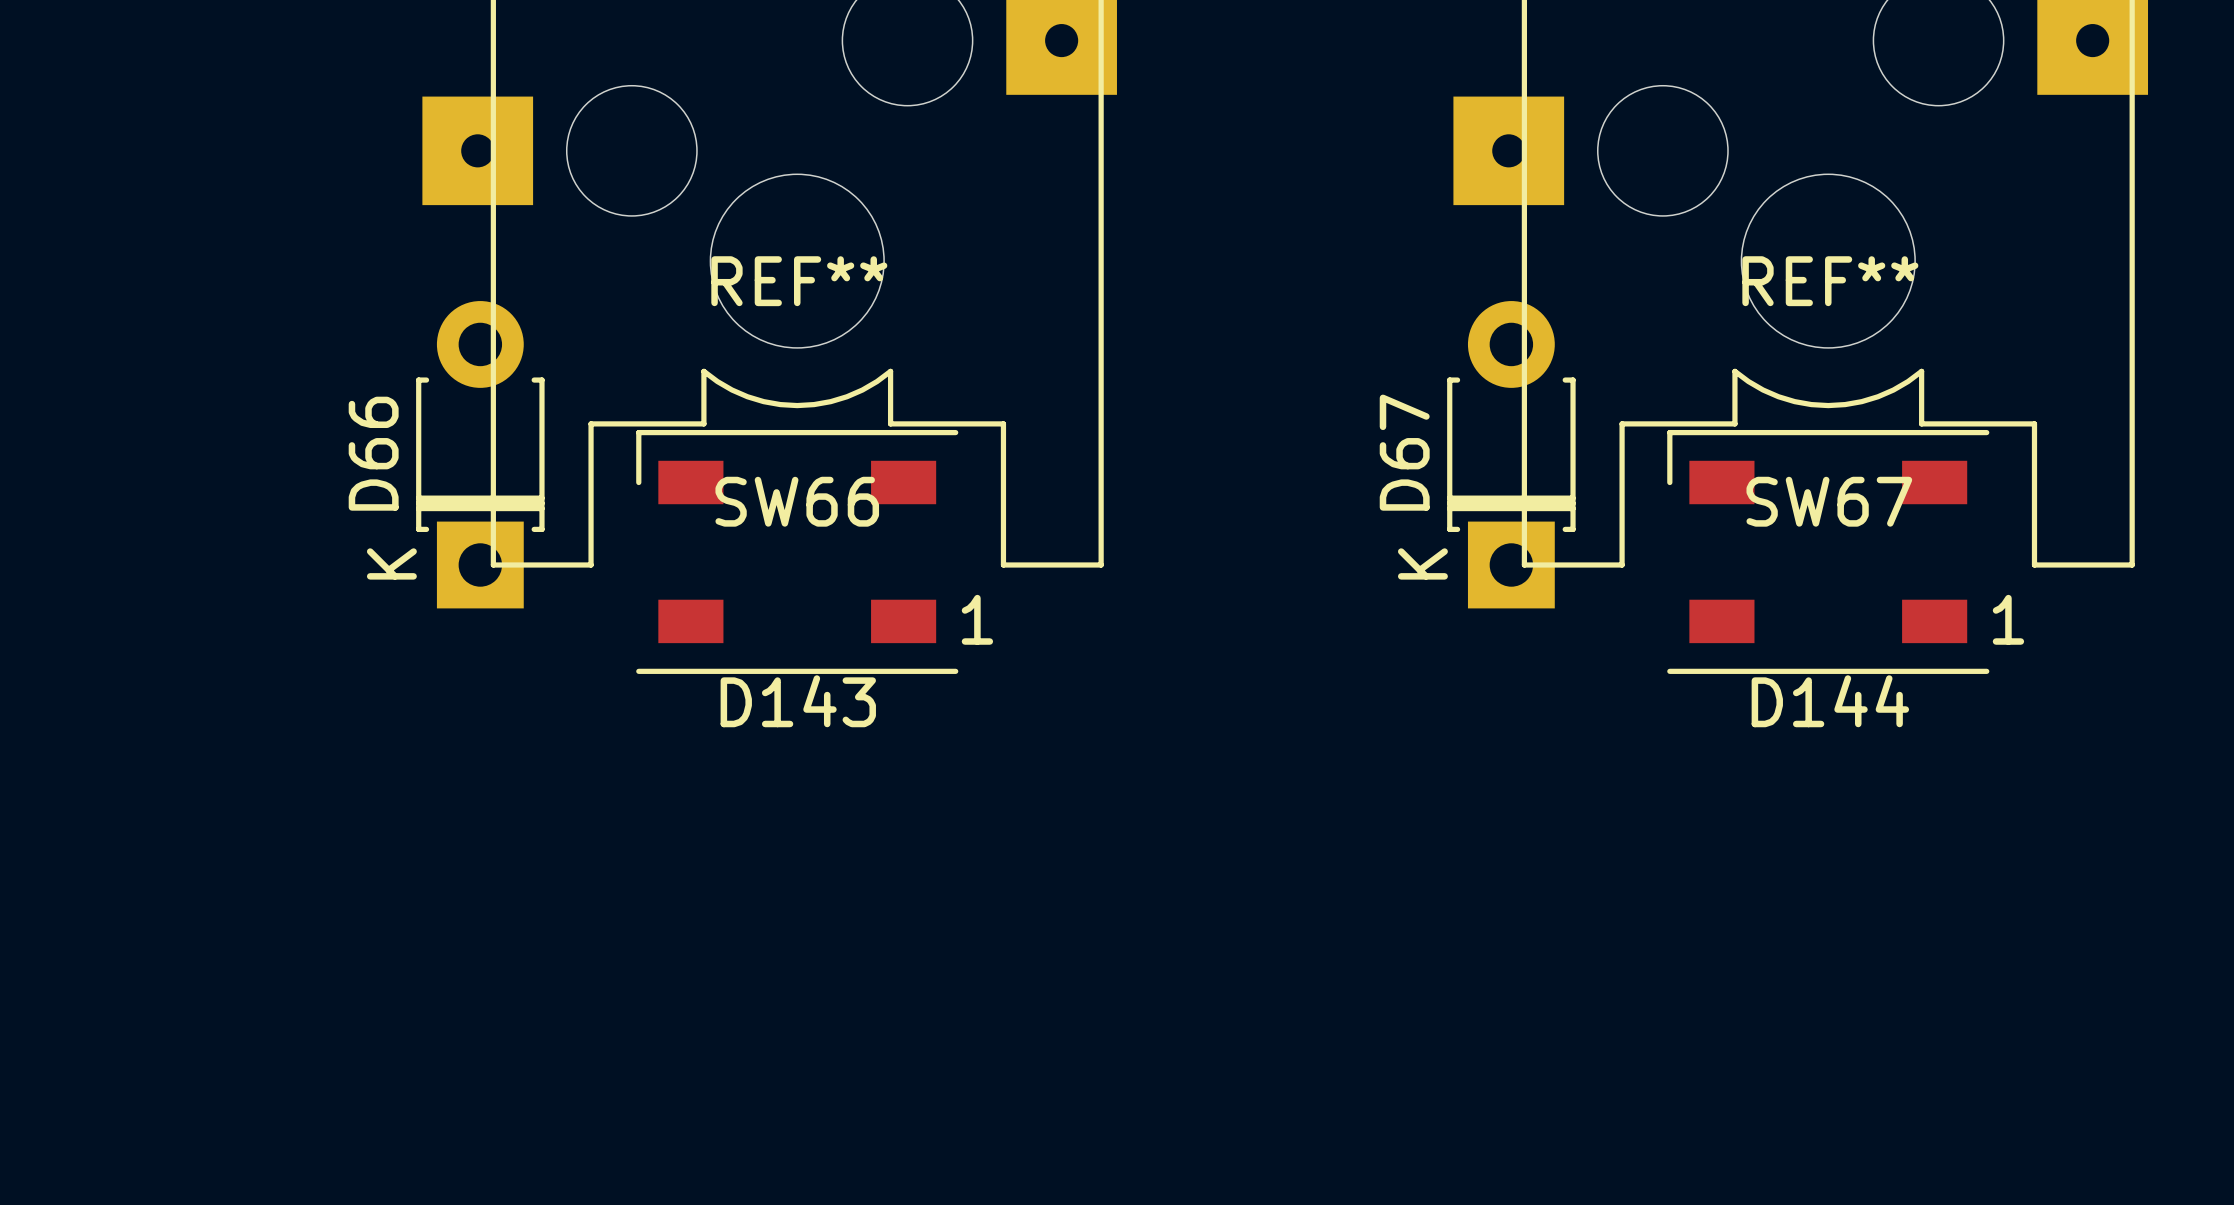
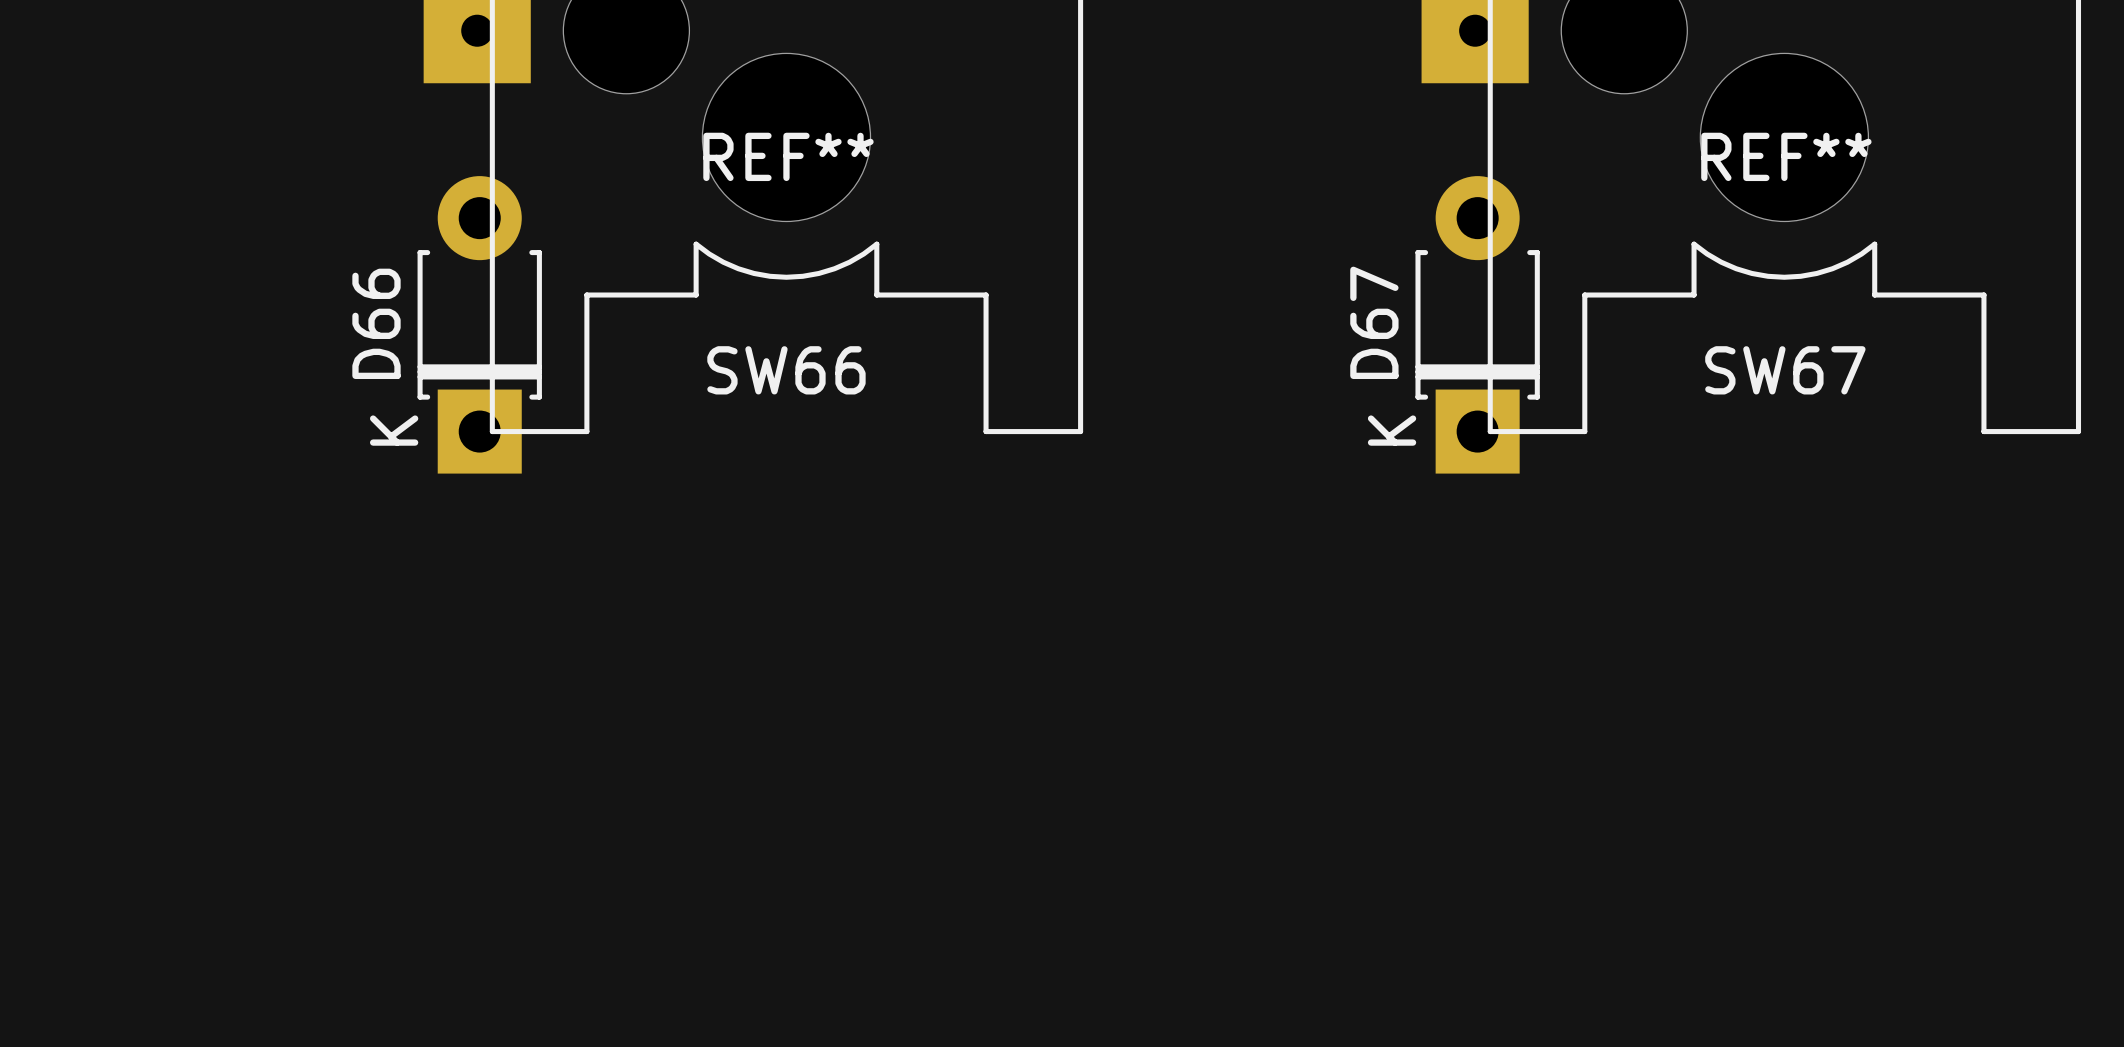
D143: (797, 551) -> none
D144: (1828, 551) -> none

